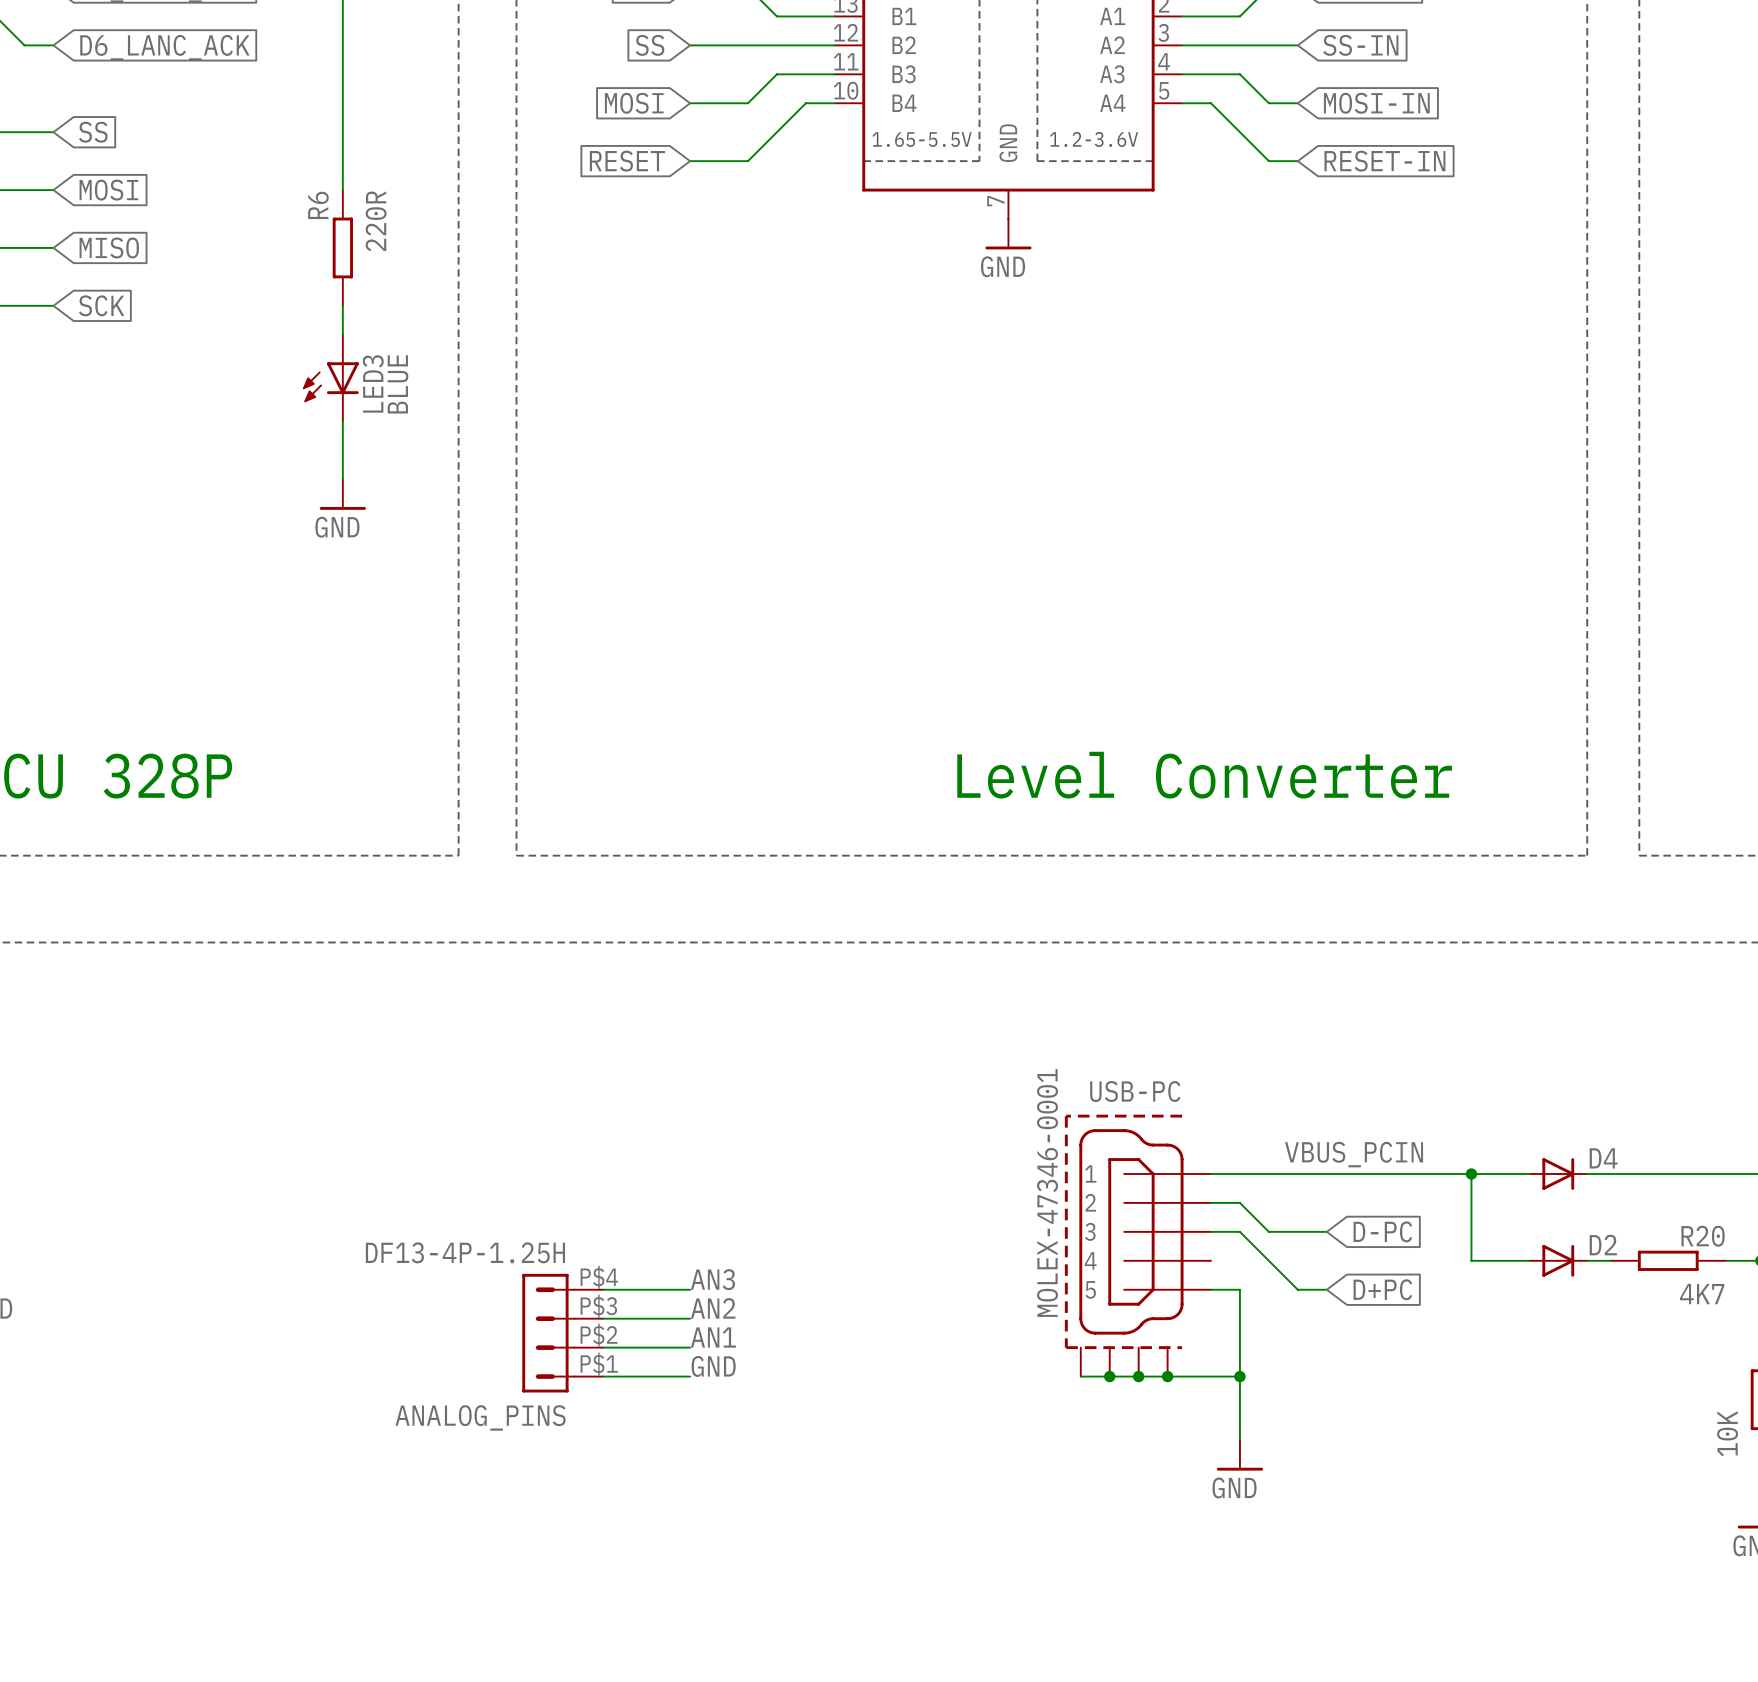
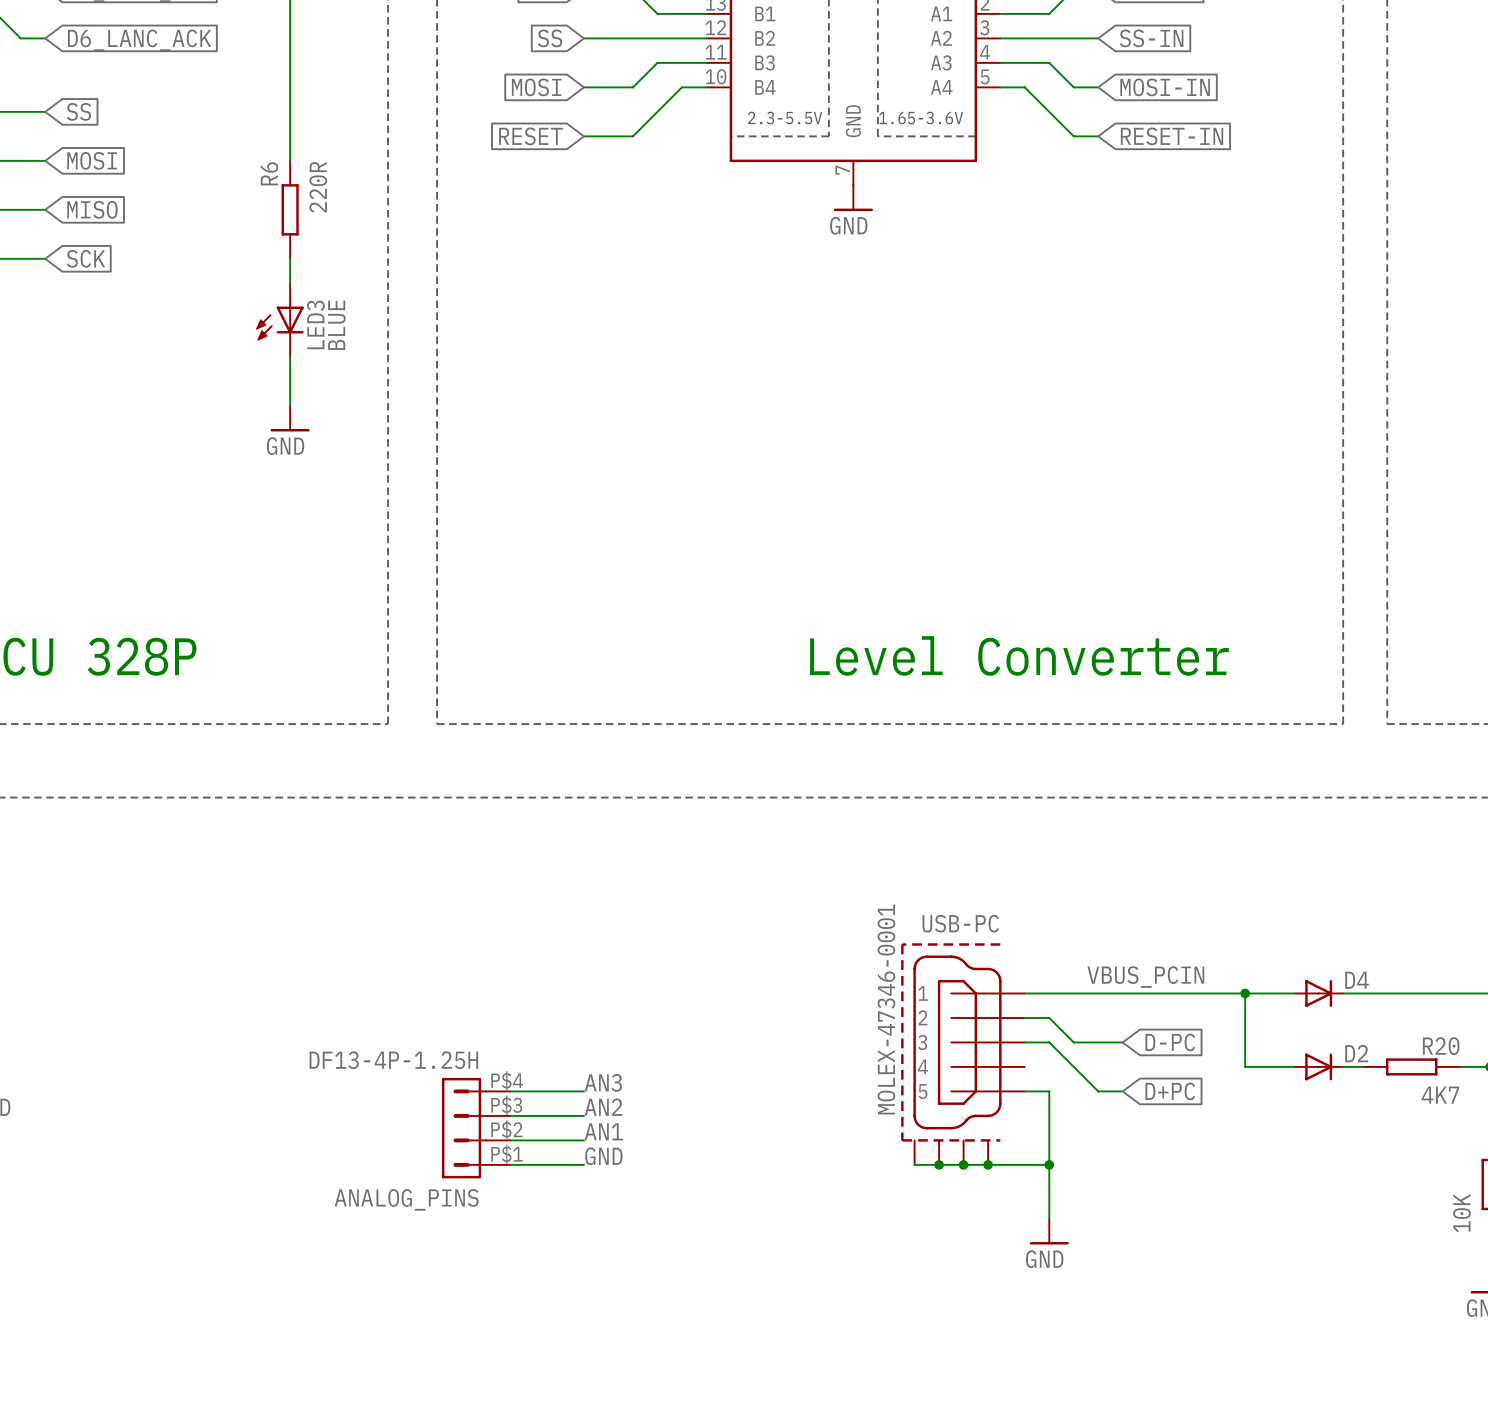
part text: 1.65-5.5V (922, 139) -> 2.3-5.5V (785, 118)
part text: 1.2-3.6V (1094, 139) -> 1.65-3.6V (921, 118)

